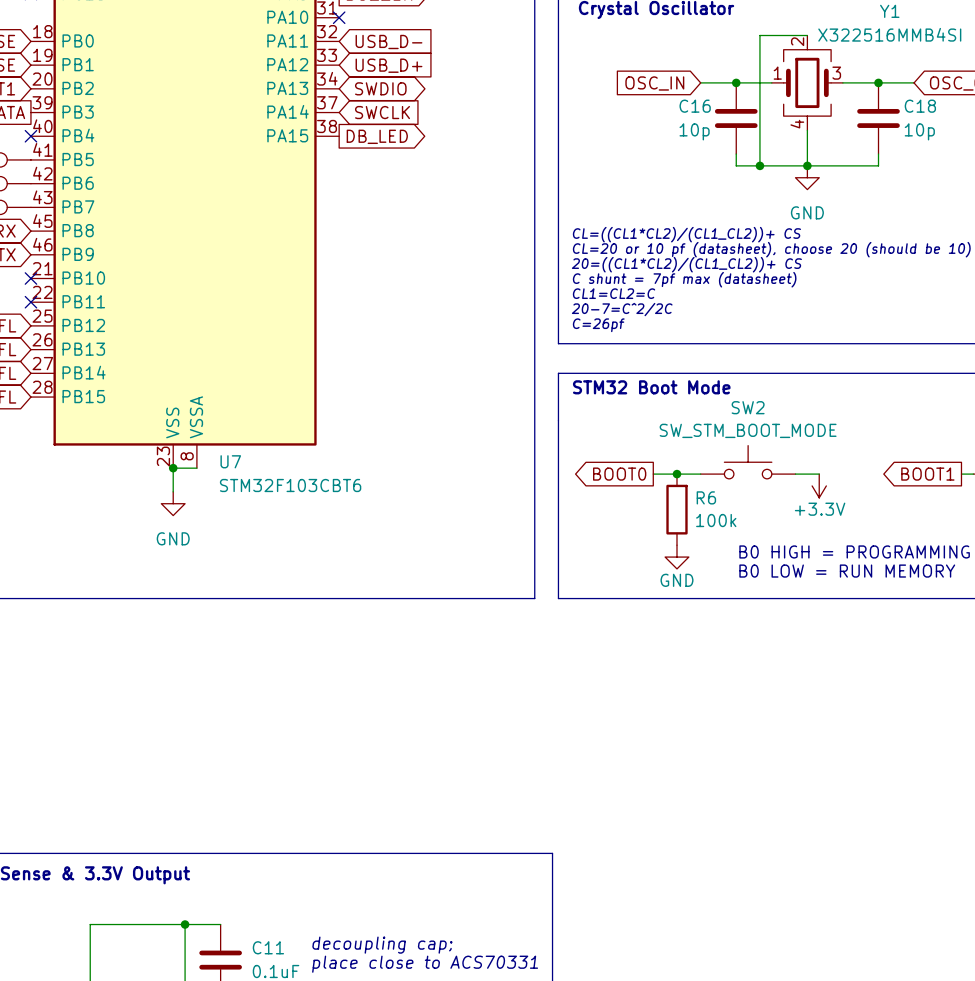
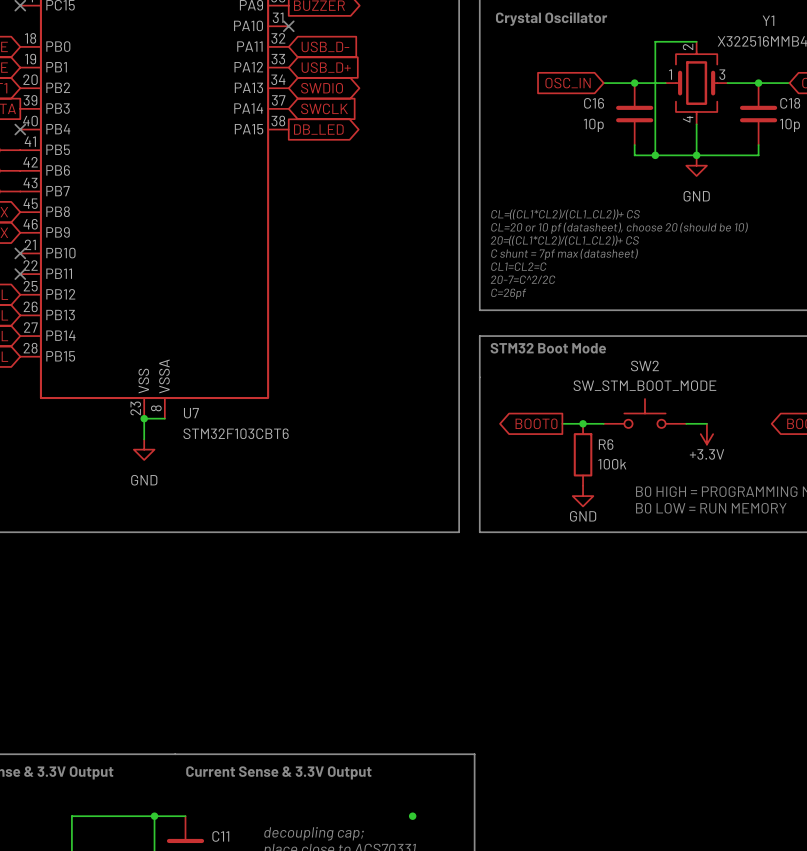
text: none -> Current Sense & 3.3V Output (278, 772)
junction: none -> (412, 816)

